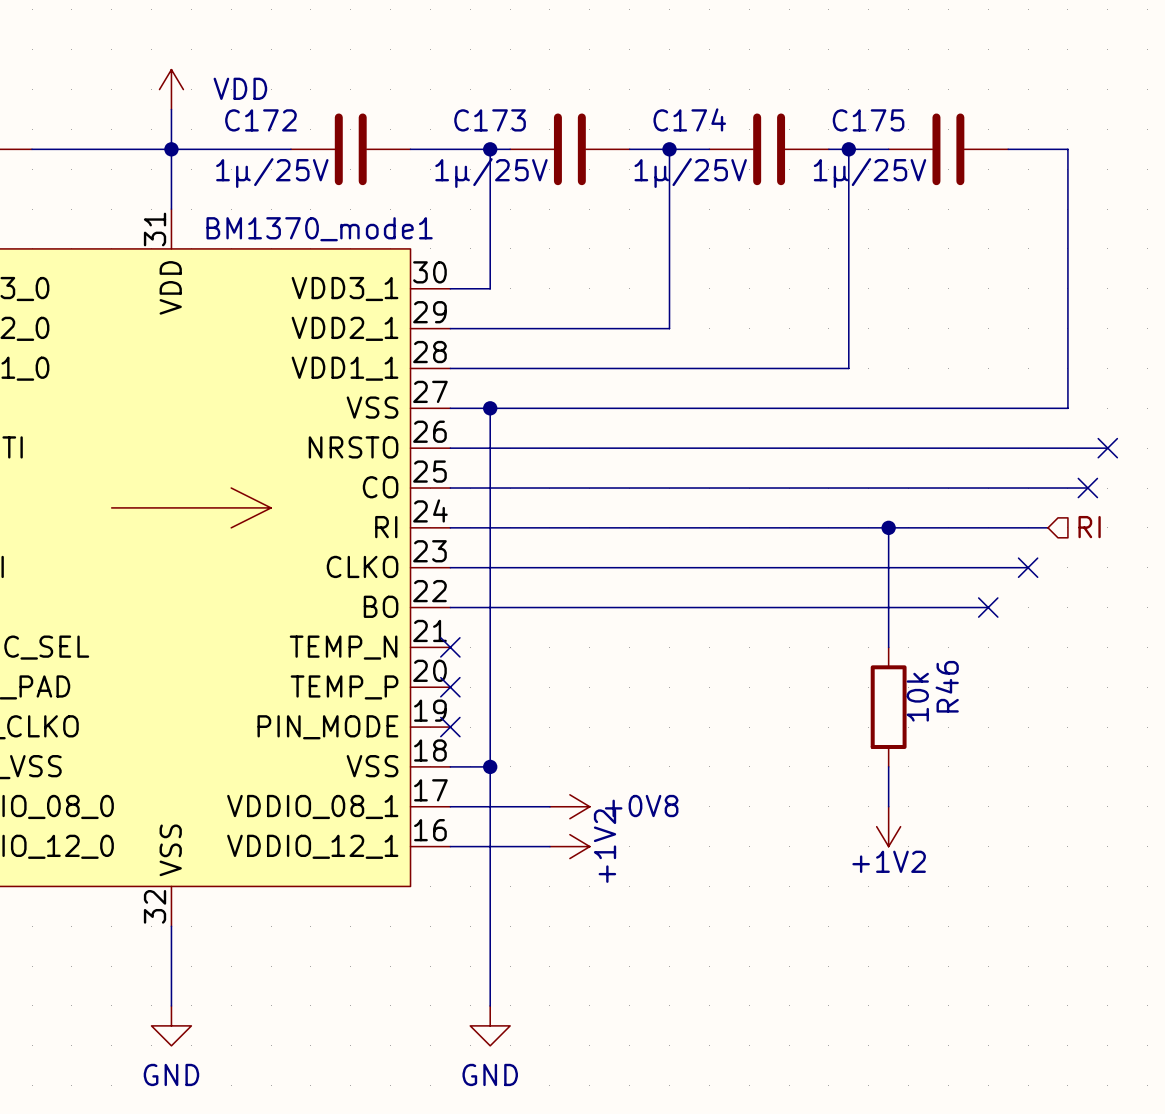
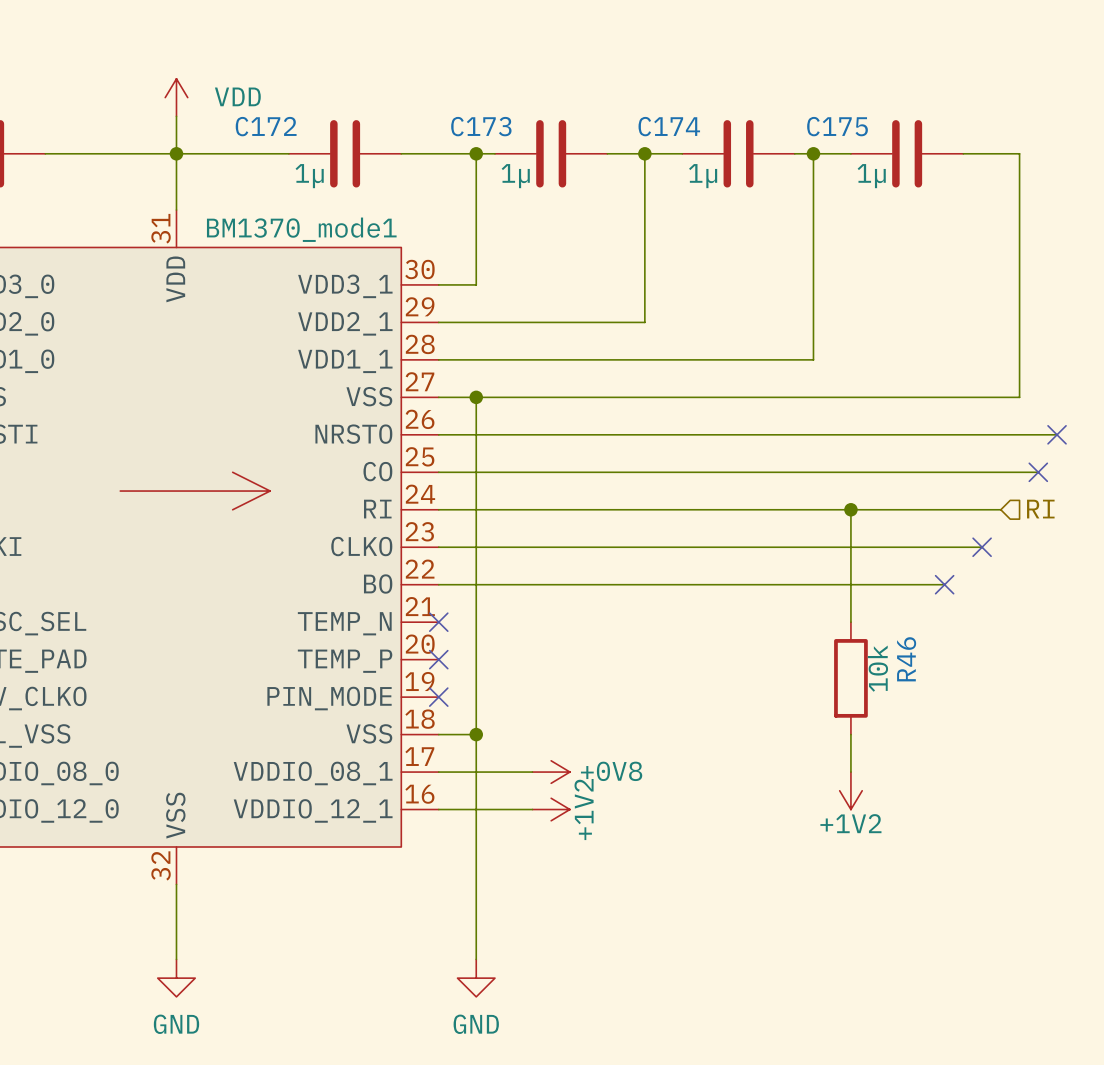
C172 value: 1µ/25V (272, 173) -> 1µ (309, 176)
C173 value: 1µ/25V (491, 173) -> 1µ (515, 176)
C174 value: 1µ/25V (690, 173) -> 1µ (703, 176)
C175 value: 1µ/25V (869, 173) -> 1µ (871, 176)

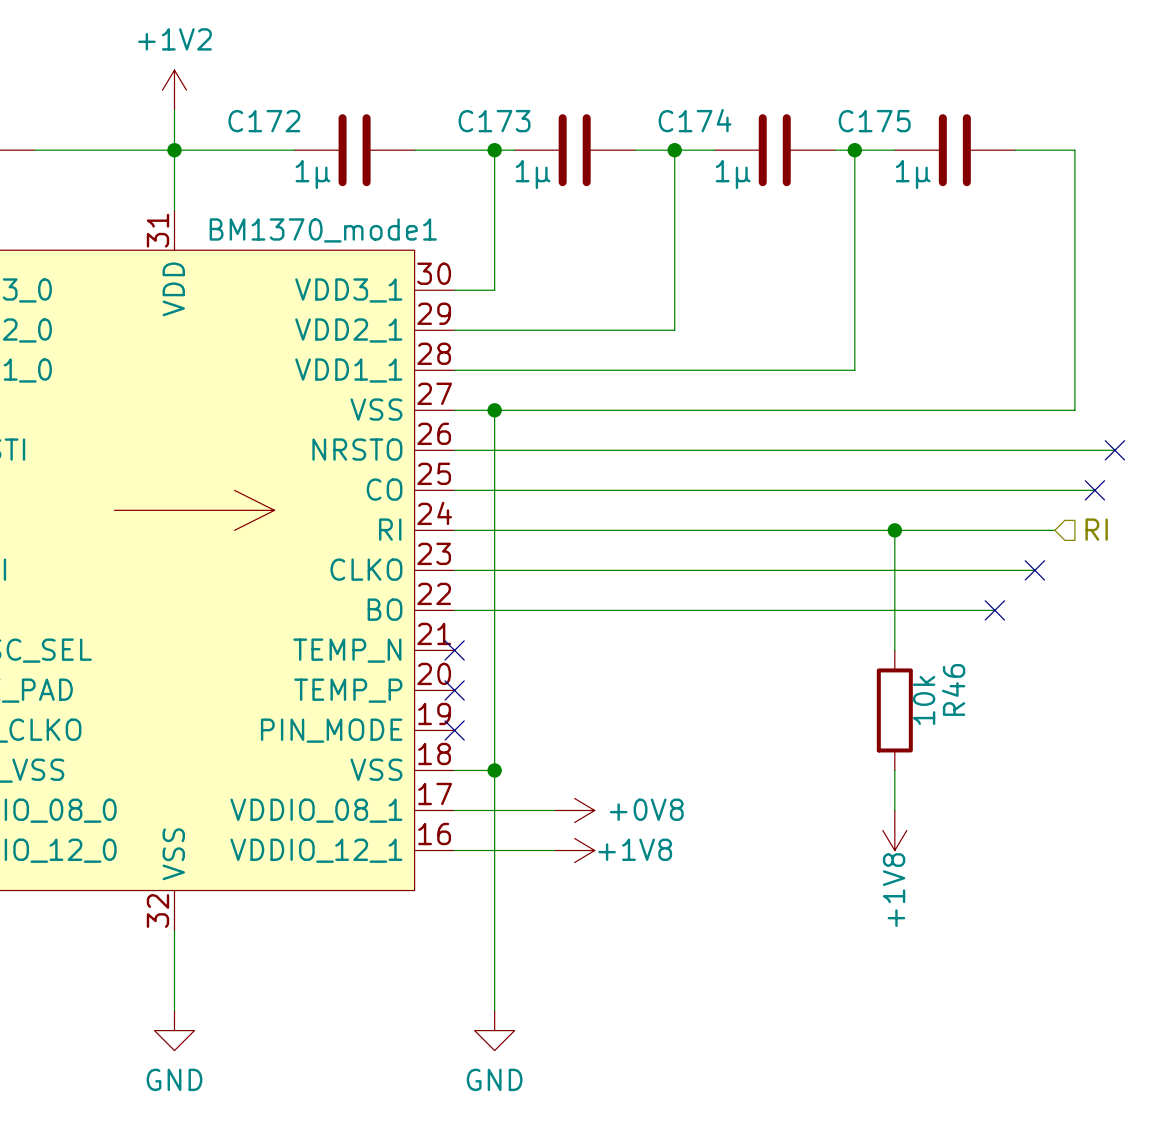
power symbol: VDD (176, 97) -> +1V2 (174, 90)
power symbol: +1V2 (850, 790) -> +1V8 (894, 830)
power symbol: +1V2 (551, 809) -> +1V8 (574, 850)

